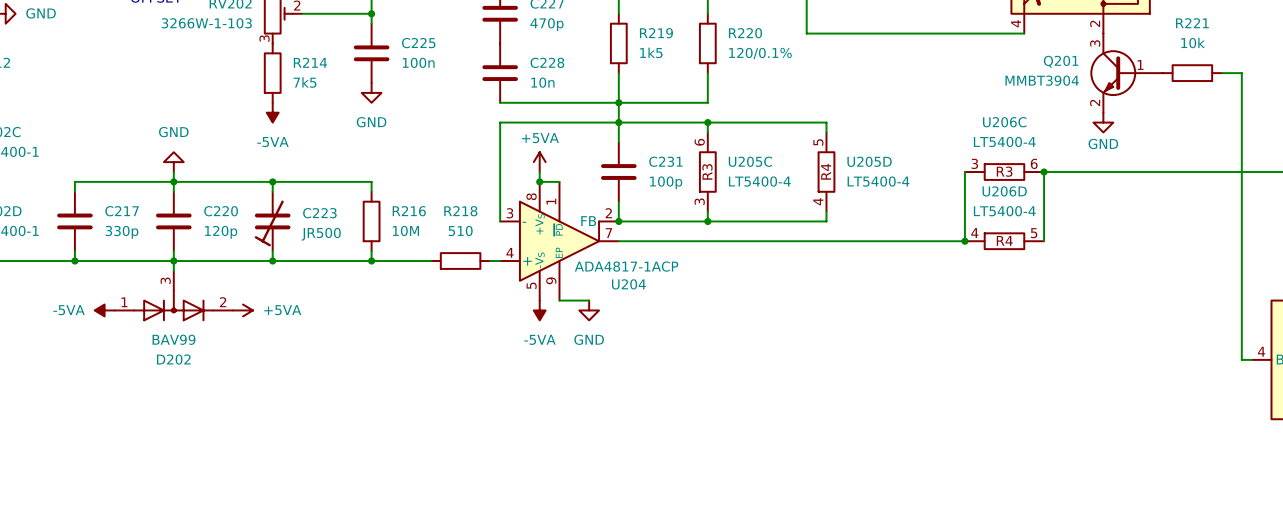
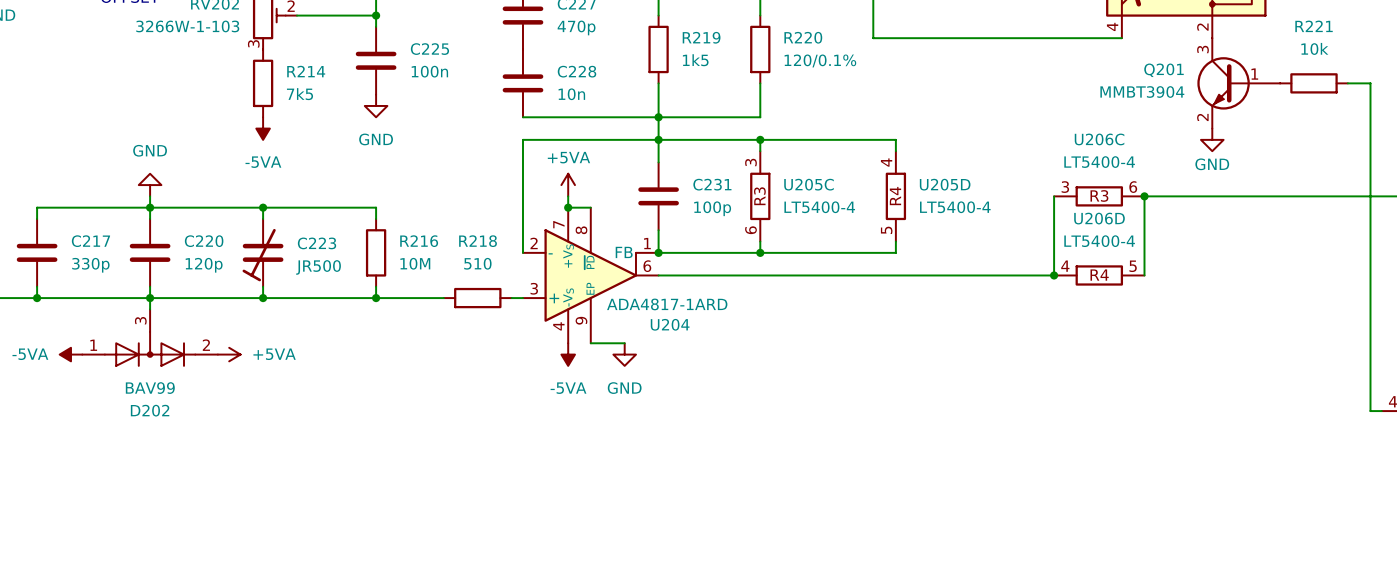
U205C rotation: 0° (707, 172) -> 180° (760, 196)
U205D rotation: 0° (826, 172) -> 180° (895, 196)
U204 pin number: 8 (531, 196) -> 7 (558, 224)
U204 pin number: 1 (551, 201) -> 8 (581, 230)
U204 pin number: 3 (510, 213) -> 2 (534, 243)
U204 pin number: 2 (608, 213) -> 1 (647, 243)
U204 pin number: 7 (608, 233) -> 6 (647, 266)
U204 pin number: 4 (509, 252) -> 3 (534, 288)
U204 value: ADA4817-1ACP (626, 266) -> ADA4817-1ARD (667, 304)
U204 pin number: 5 (531, 285) -> 4 (558, 326)

